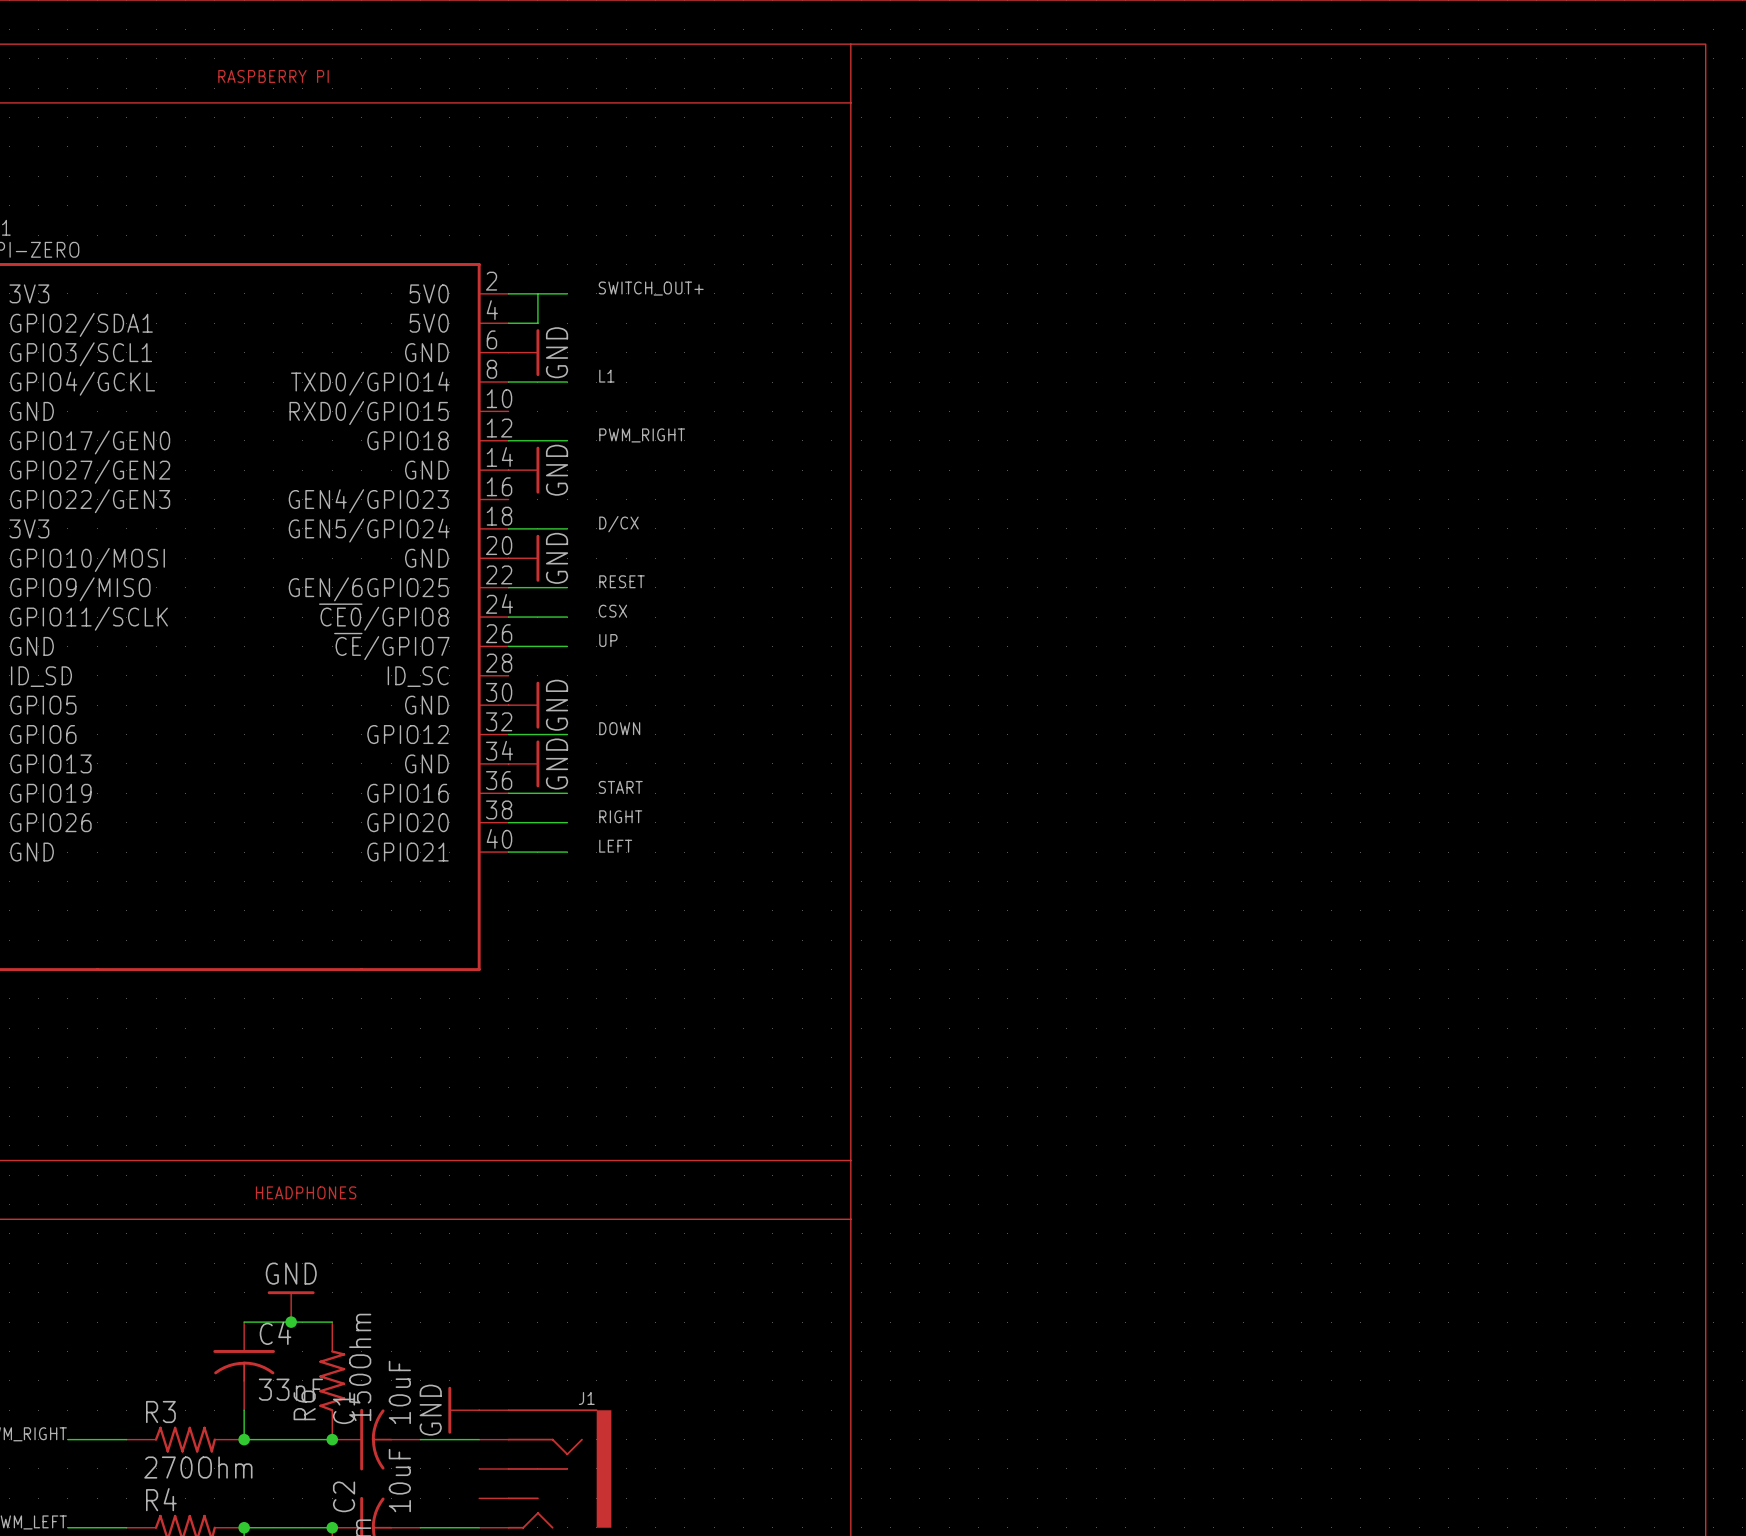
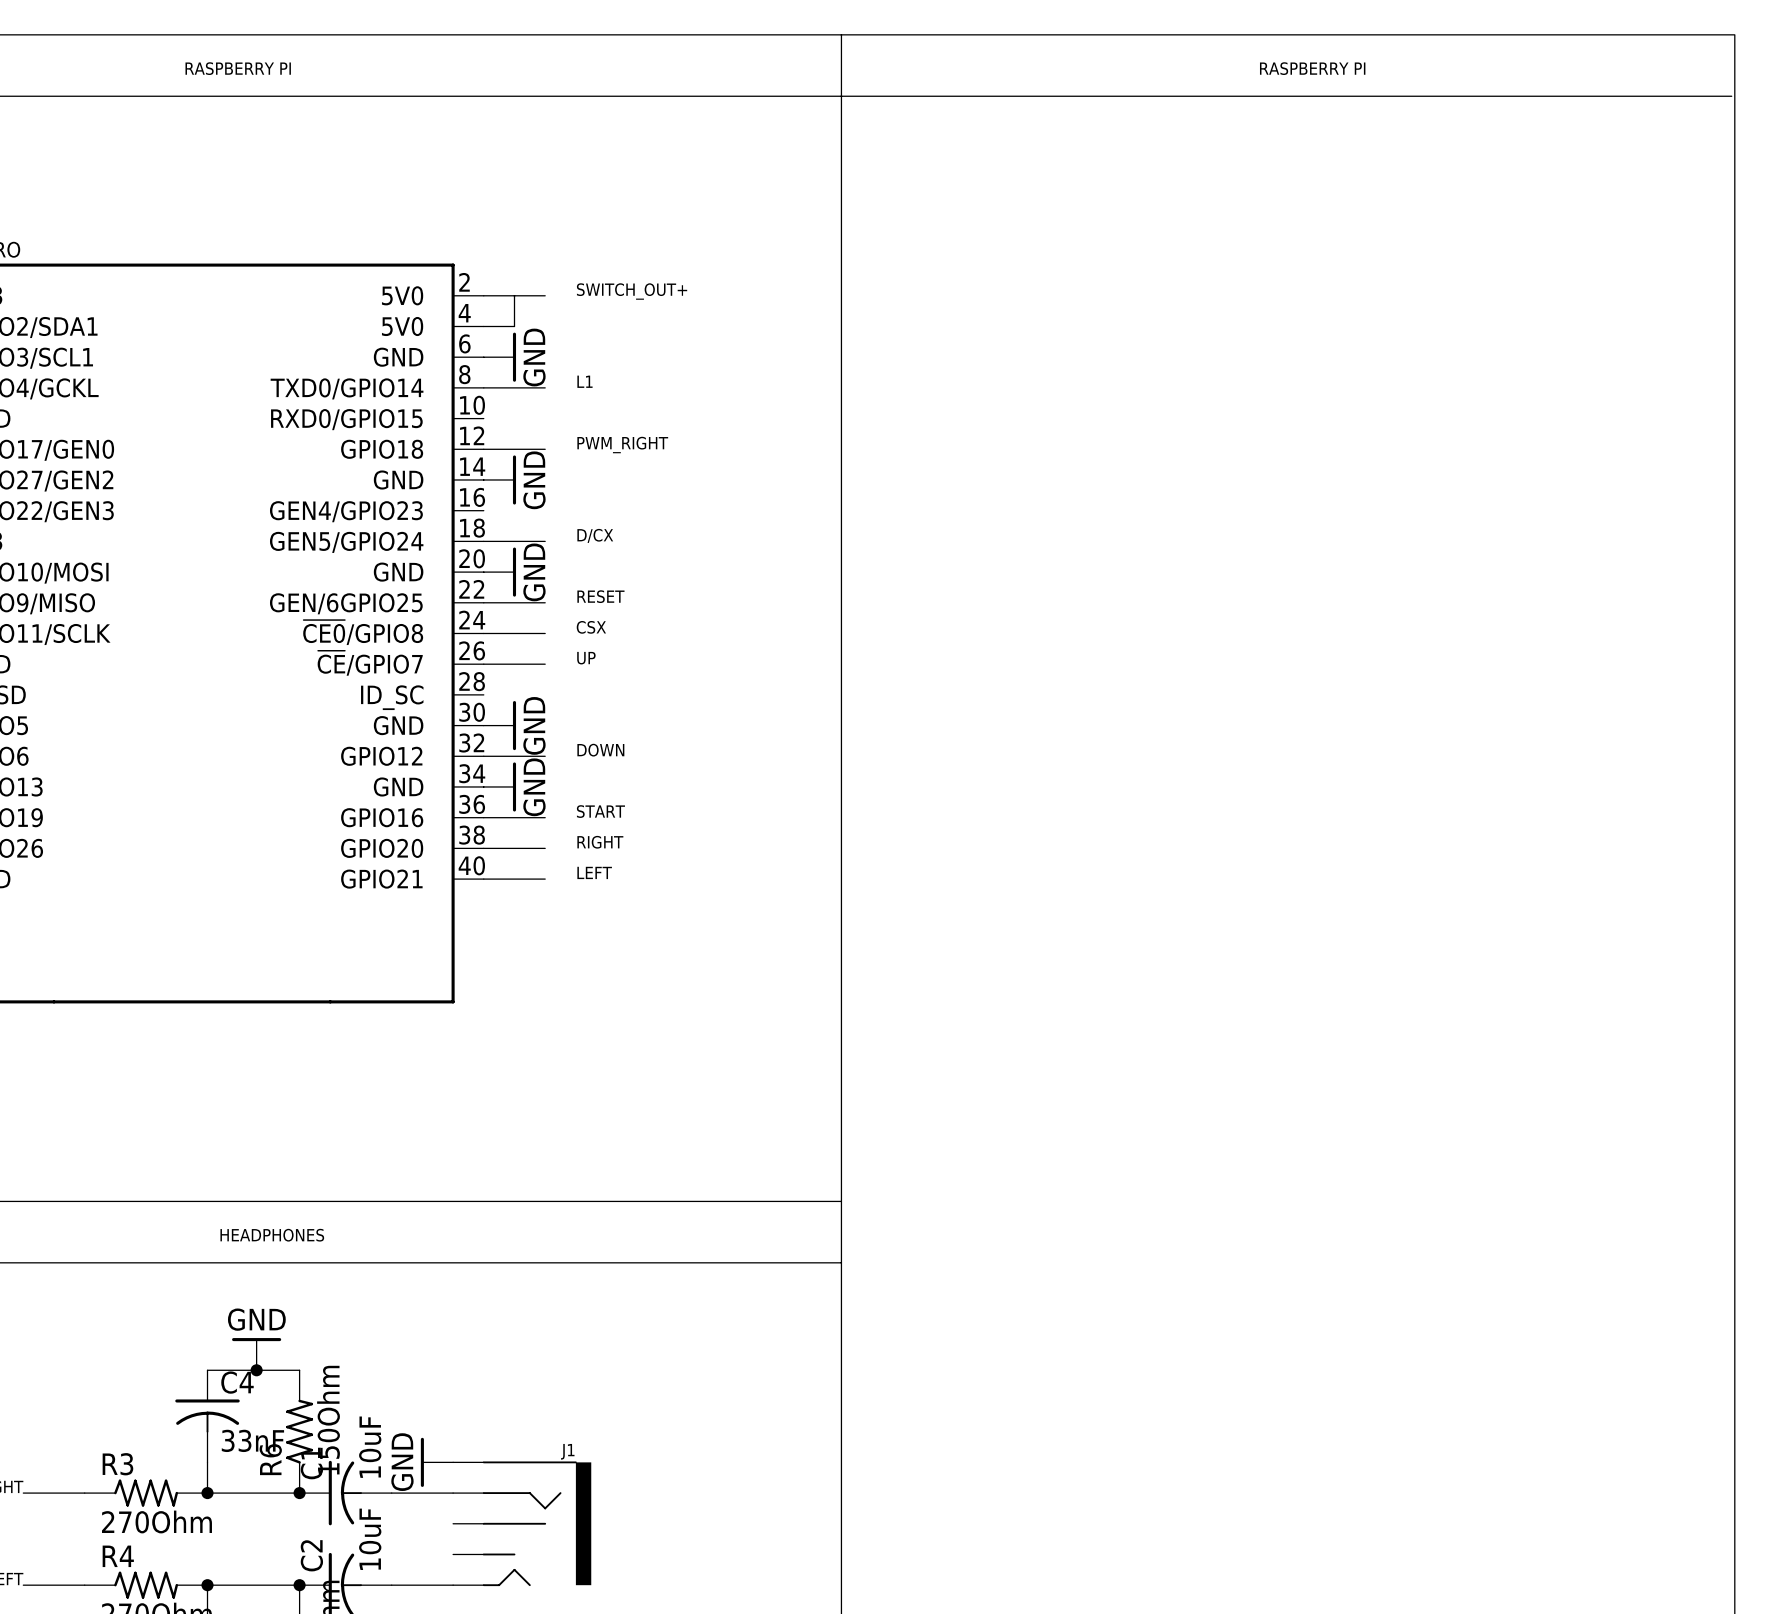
text: none -> RASPBERRY PI (1312, 68)
line: none -> (841, 96) (1731, 96)

